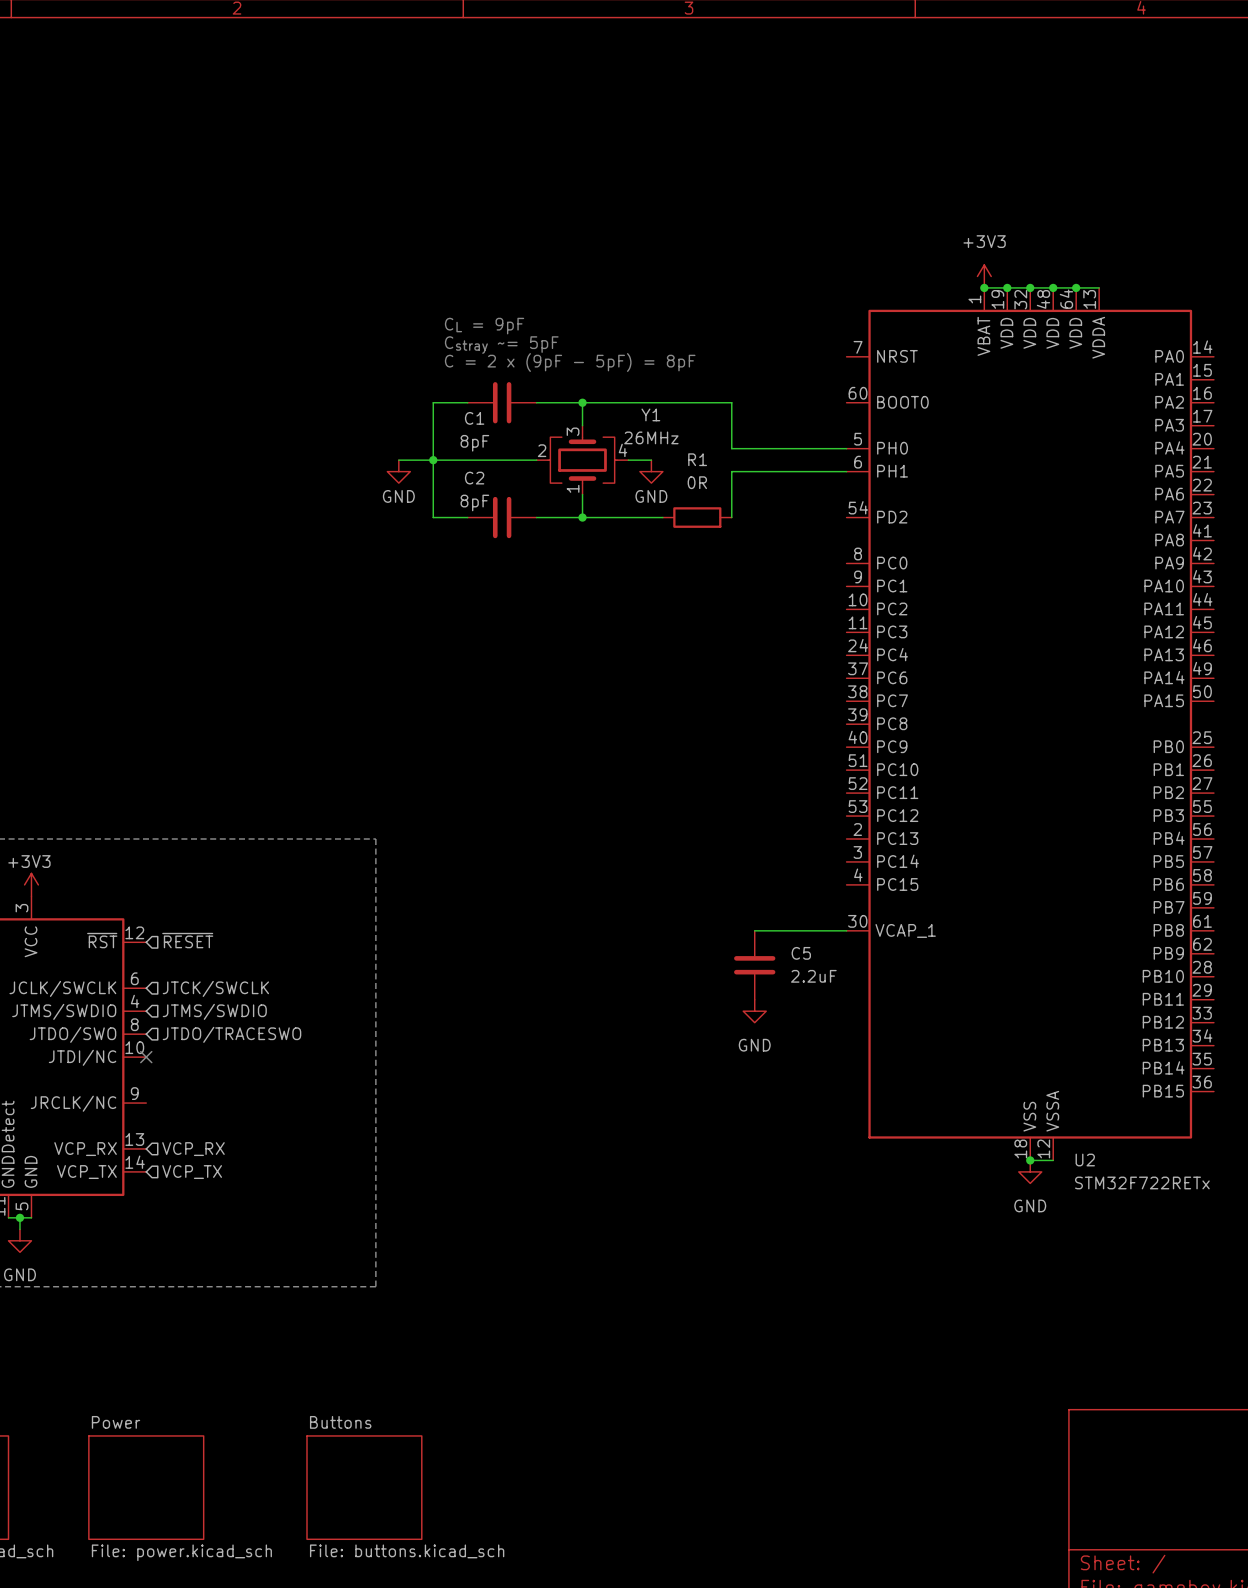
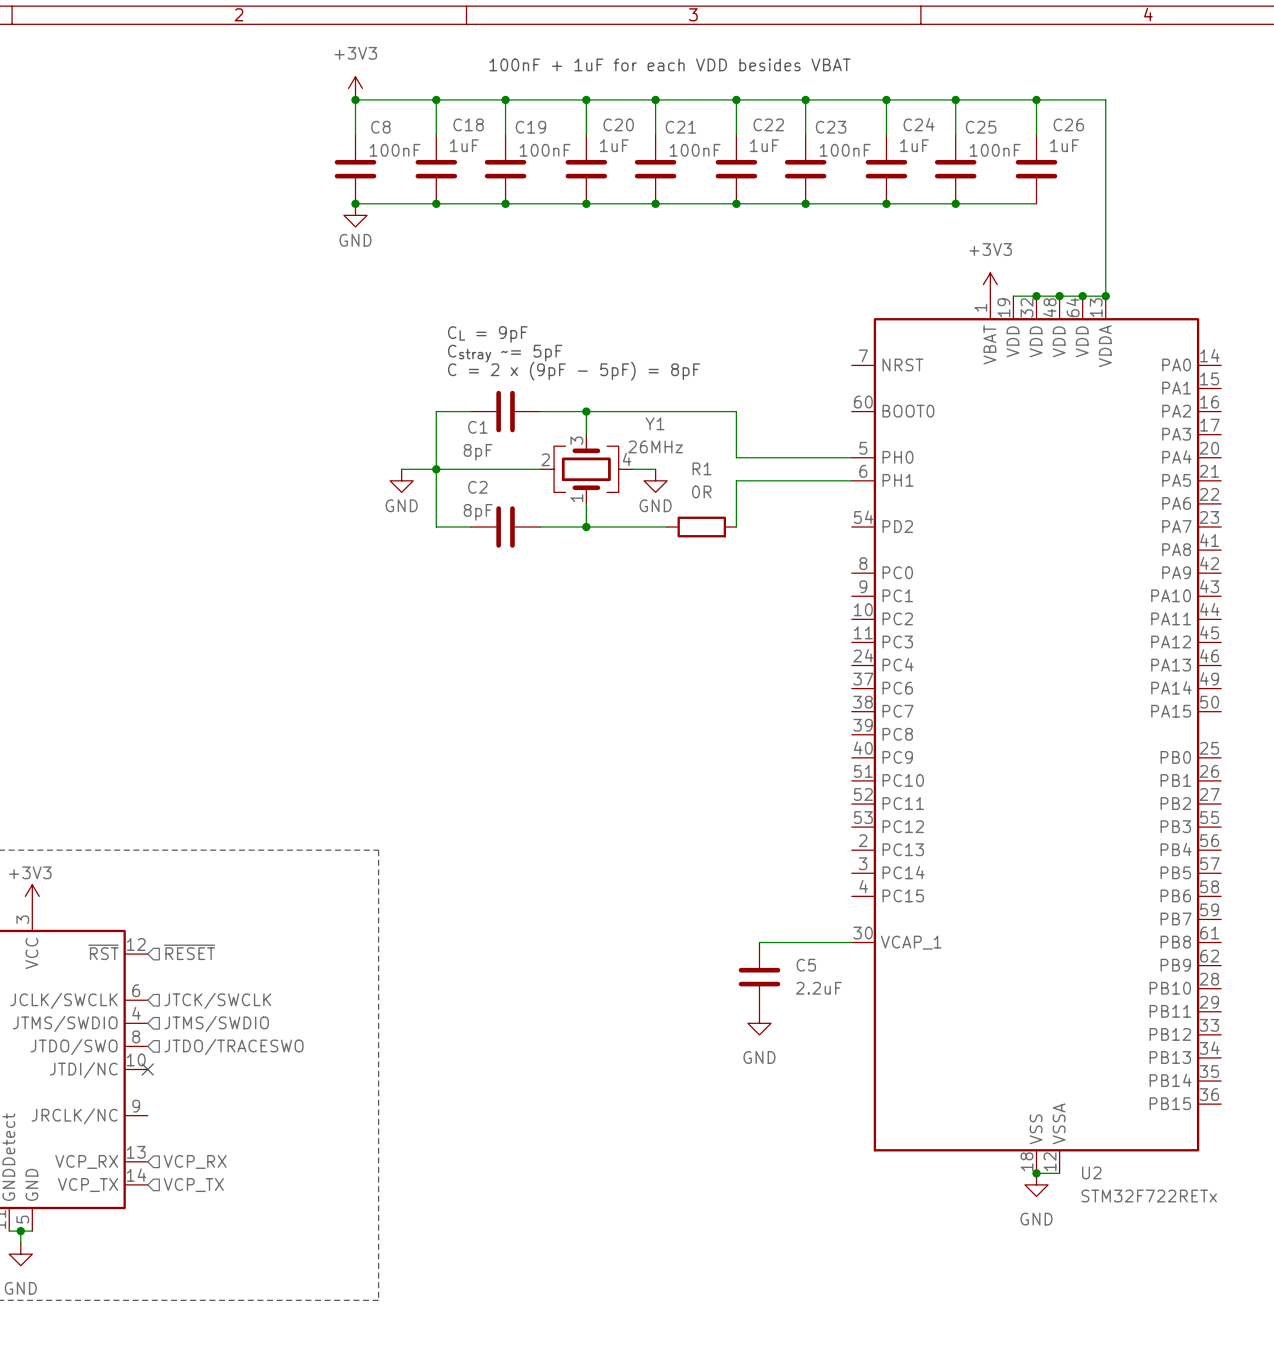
text: none -> 100nF + 1uF for each VDD besides VBAT (670, 64)
power symbol: none -> +3V3 (355, 88)
junction: none -> (355, 99)
wire: none -> (436, 99) (436, 134)
junction: none -> (436, 99)
wire: none -> (505, 99) (505, 134)
junction: none -> (505, 99)
wire: none -> (586, 99) (586, 134)
junction: none -> (586, 99)
wire: none -> (655, 99) (655, 134)
junction: none -> (655, 99)
wire: none -> (736, 99) (736, 134)
junction: none -> (736, 99)
wire: none -> (805, 99) (805, 134)
junction: none -> (805, 99)
wire: none -> (886, 99) (886, 134)
junction: none -> (886, 99)
wire: none -> (955, 99) (955, 134)
junction: none -> (955, 99)
wire: none -> (1036, 99) (1036, 134)
junction: none -> (1036, 99)
wire: none -> (355, 134) (355, 99) (1105, 99) (1105, 296)
C8: none -> 100nF (355, 169)
C18: none -> 1uF (436, 169)
C19: none -> 100nF (505, 169)
C20: none -> 1uF (586, 169)
C21: none -> 100nF (655, 169)
C22: none -> 1uF (736, 169)
C23: none -> 100nF (805, 169)
C24: none -> 1uF (886, 169)
C25: none -> 100nF (955, 169)
C26: none -> 1uF (1036, 169)
wire: none -> (355, 203) (1036, 203)
junction: none -> (355, 203)
junction: none -> (436, 203)
junction: none -> (505, 203)
junction: none -> (586, 203)
junction: none -> (655, 203)
junction: none -> (736, 203)
junction: none -> (805, 203)
junction: none -> (886, 203)
junction: none -> (955, 203)
power symbol: none -> GND (355, 215)
wire: (984, 287) (1007, 287) -> none
junction: (984, 287) -> none
junction: (1007, 287) -> none
junction: none -> (1105, 296)

